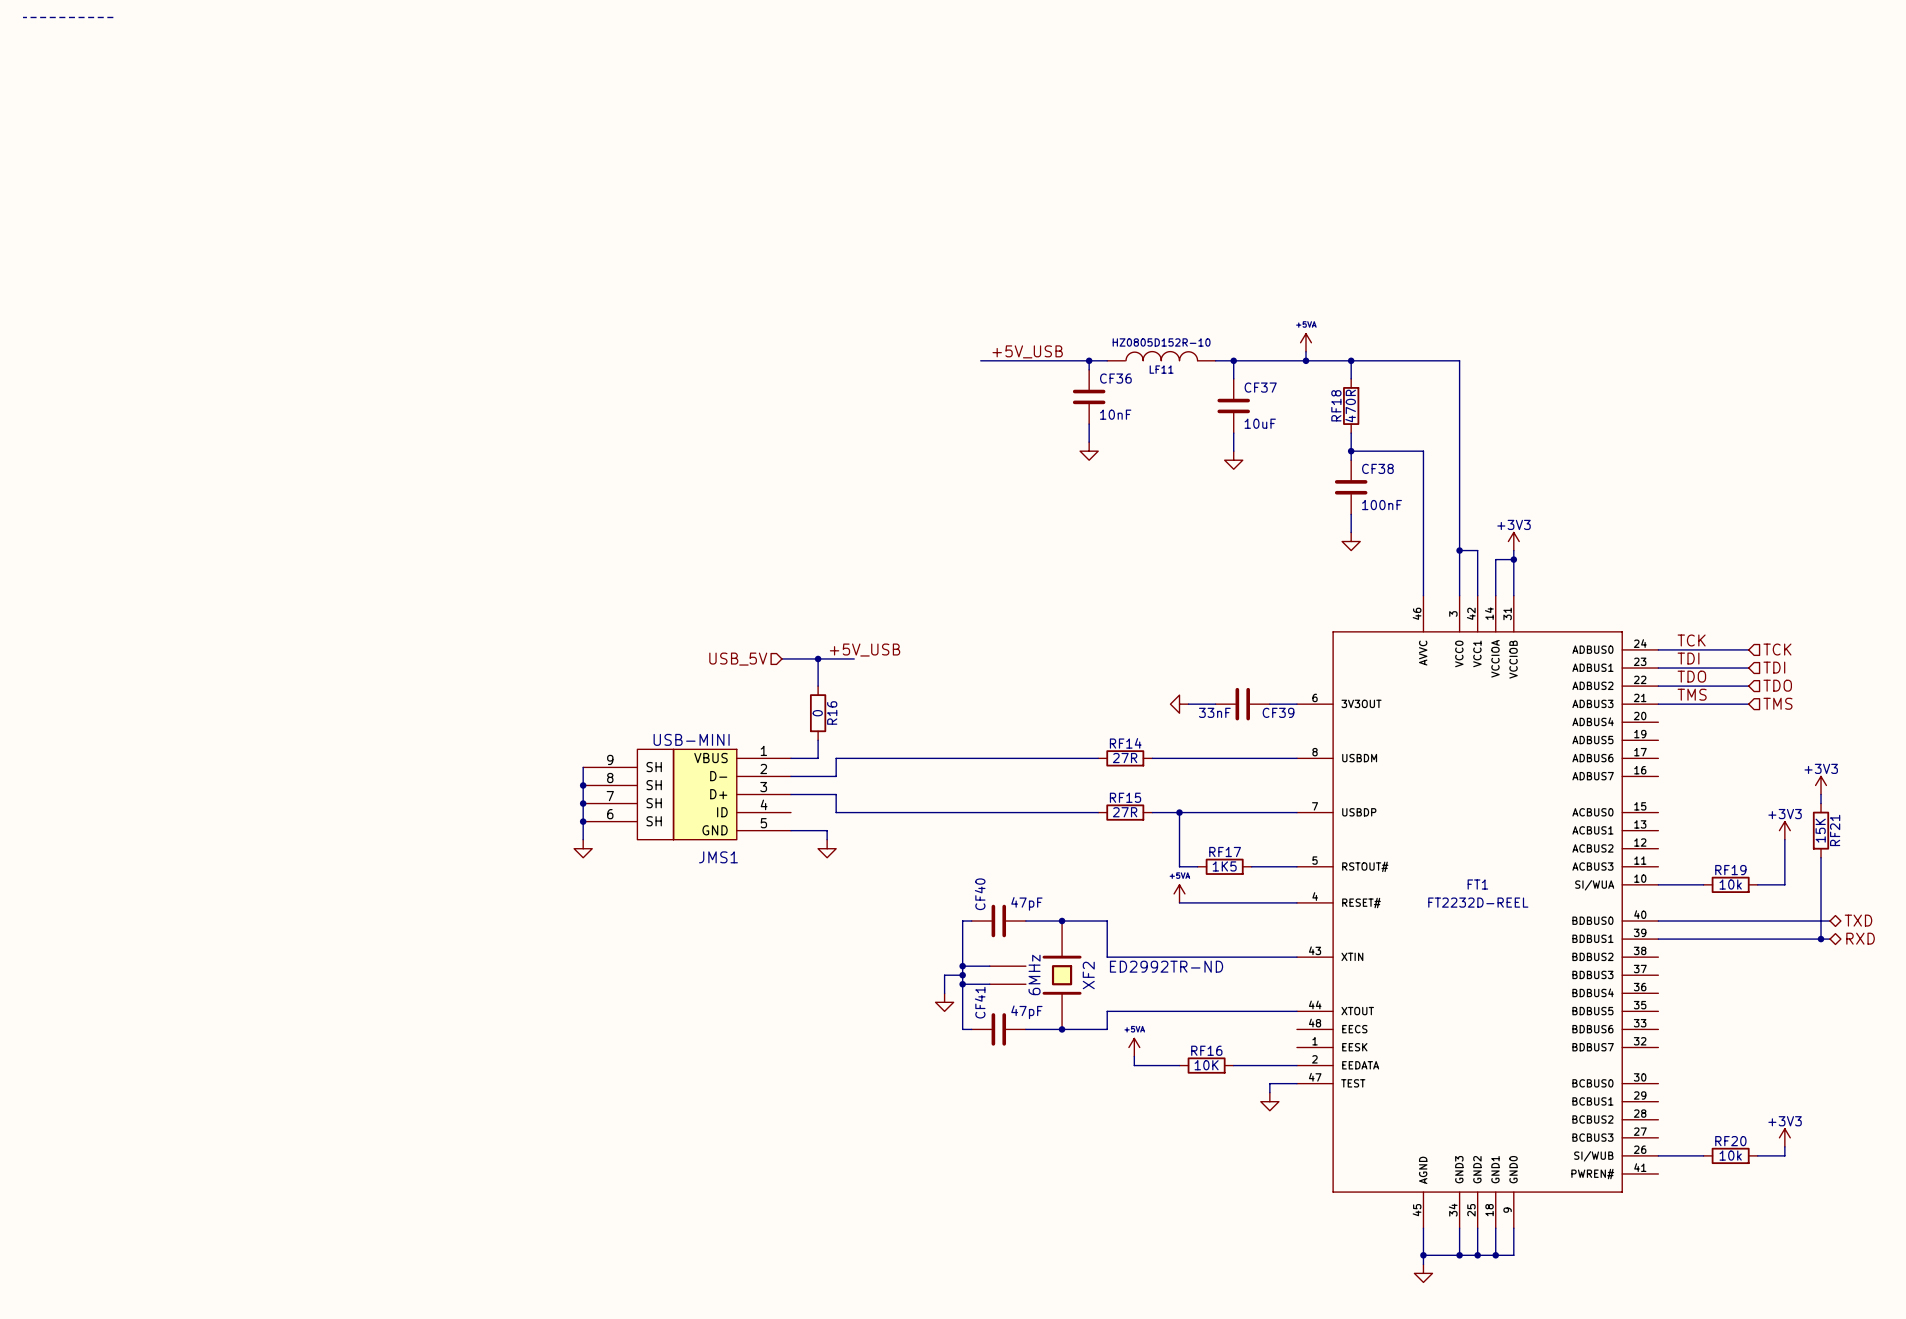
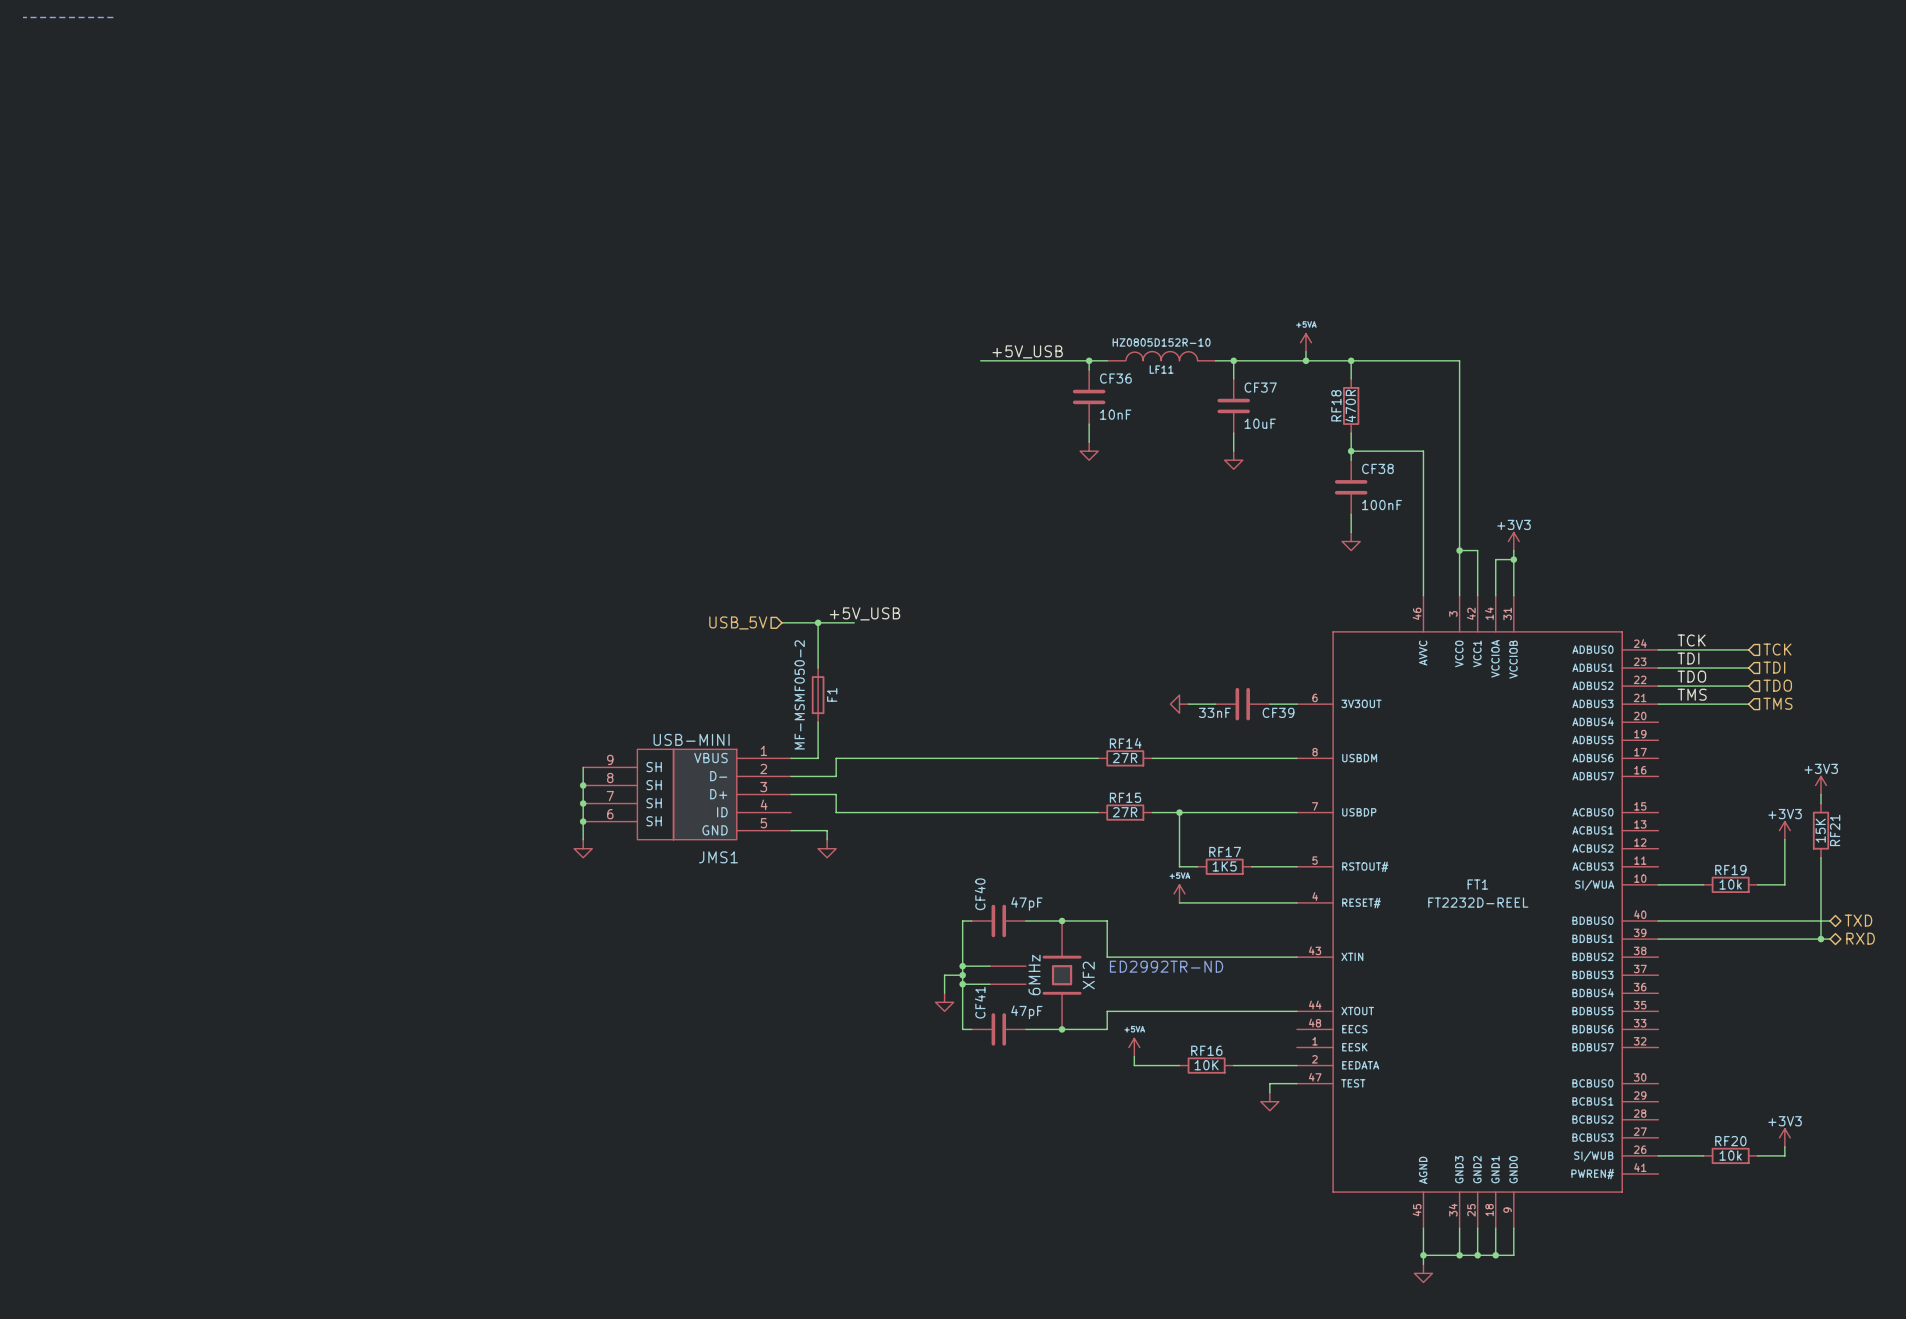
wire: none -> (818, 622) (818, 658)
label position: +5V_USB (865, 650) -> +5V_USB (865, 613)
wire: (781, 658) (854, 658) -> (781, 622) (854, 622)
junction position: (818, 658) -> (818, 622)
hierarchical label position: USB_5V (738, 659) -> USB_5V (738, 622)
F1: none -> MF-MSMF050-2 (818, 695)
R16: 0 (818, 713) -> none

